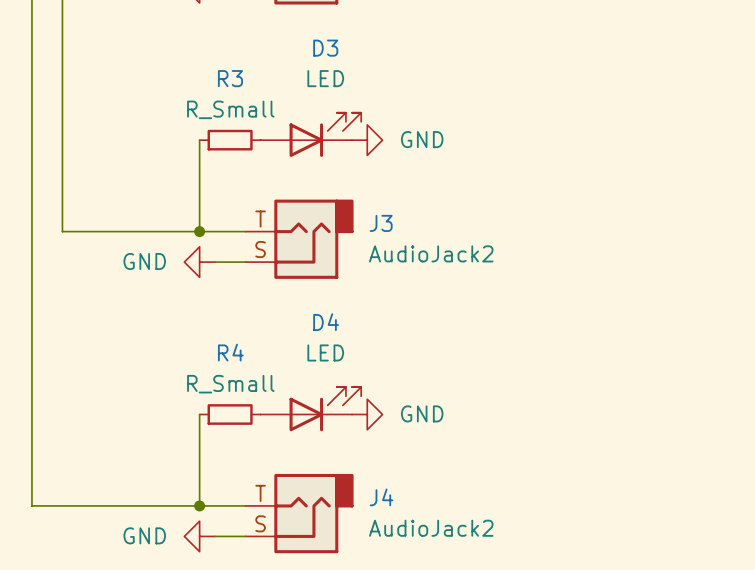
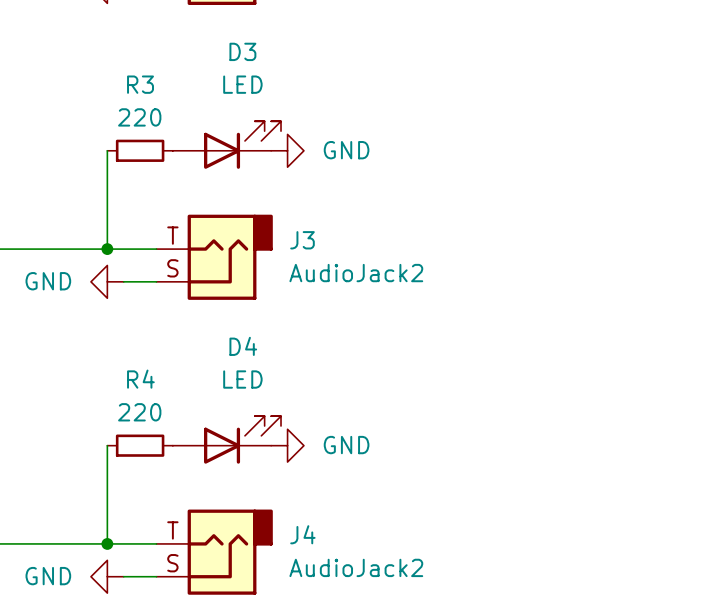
R3 value: R_Small (230, 109) -> 220 (139, 117)
R4 value: R_Small (230, 384) -> 220 (139, 412)

